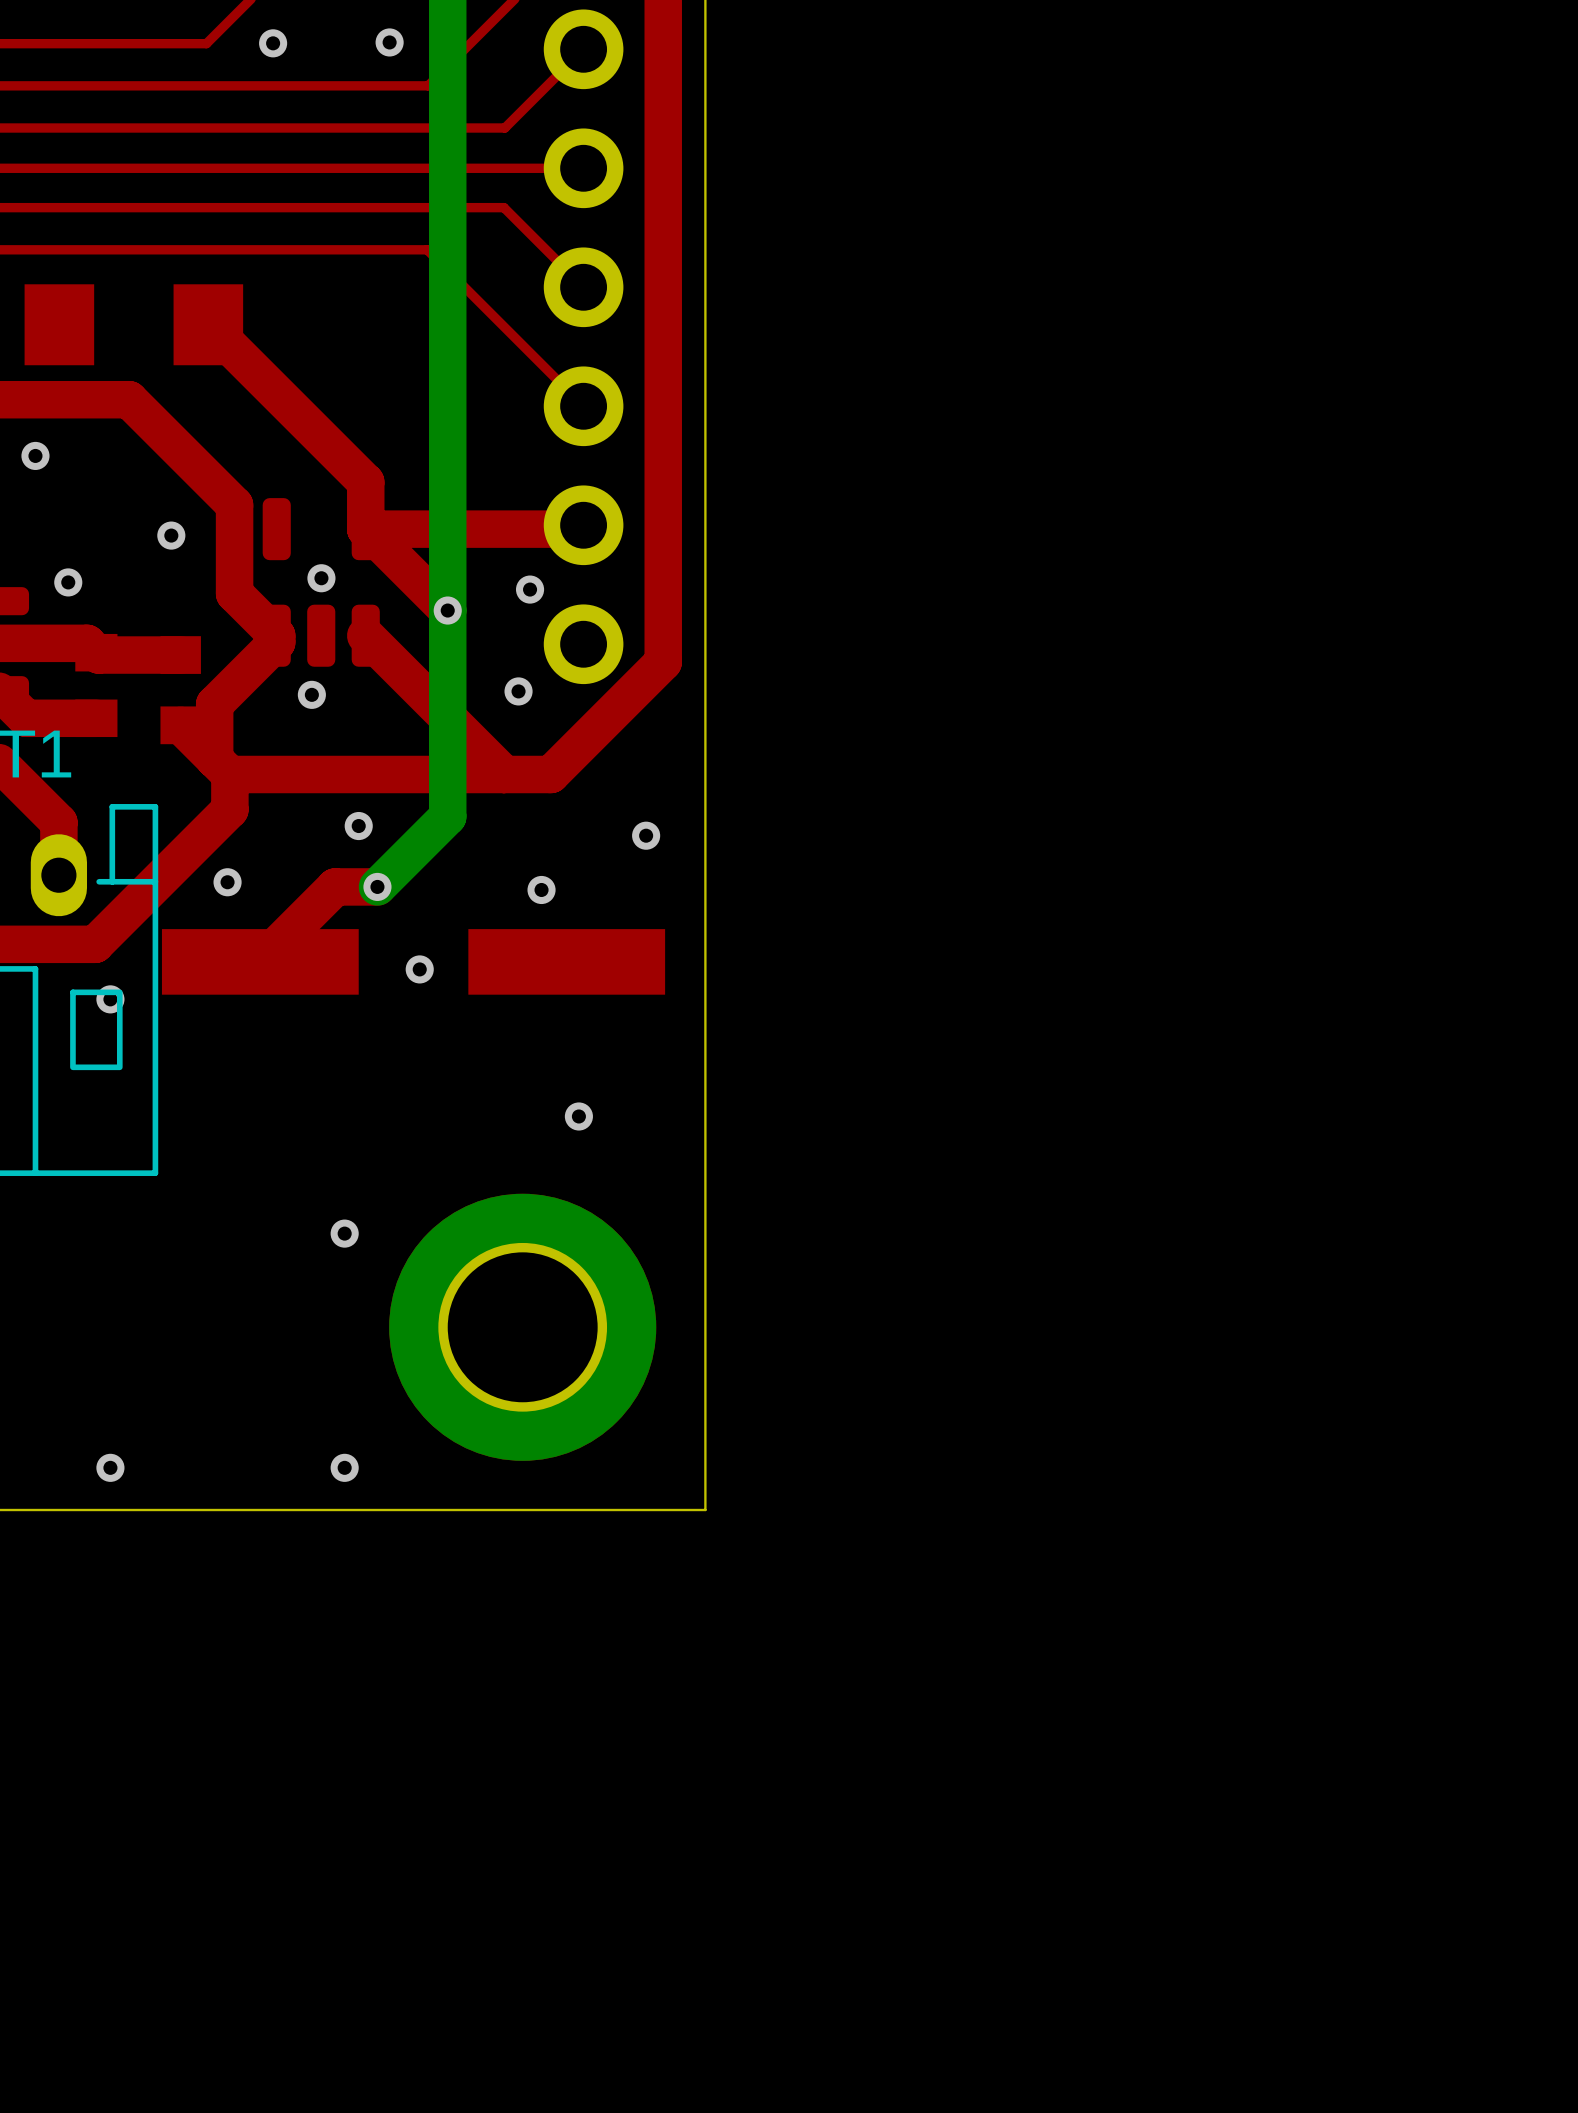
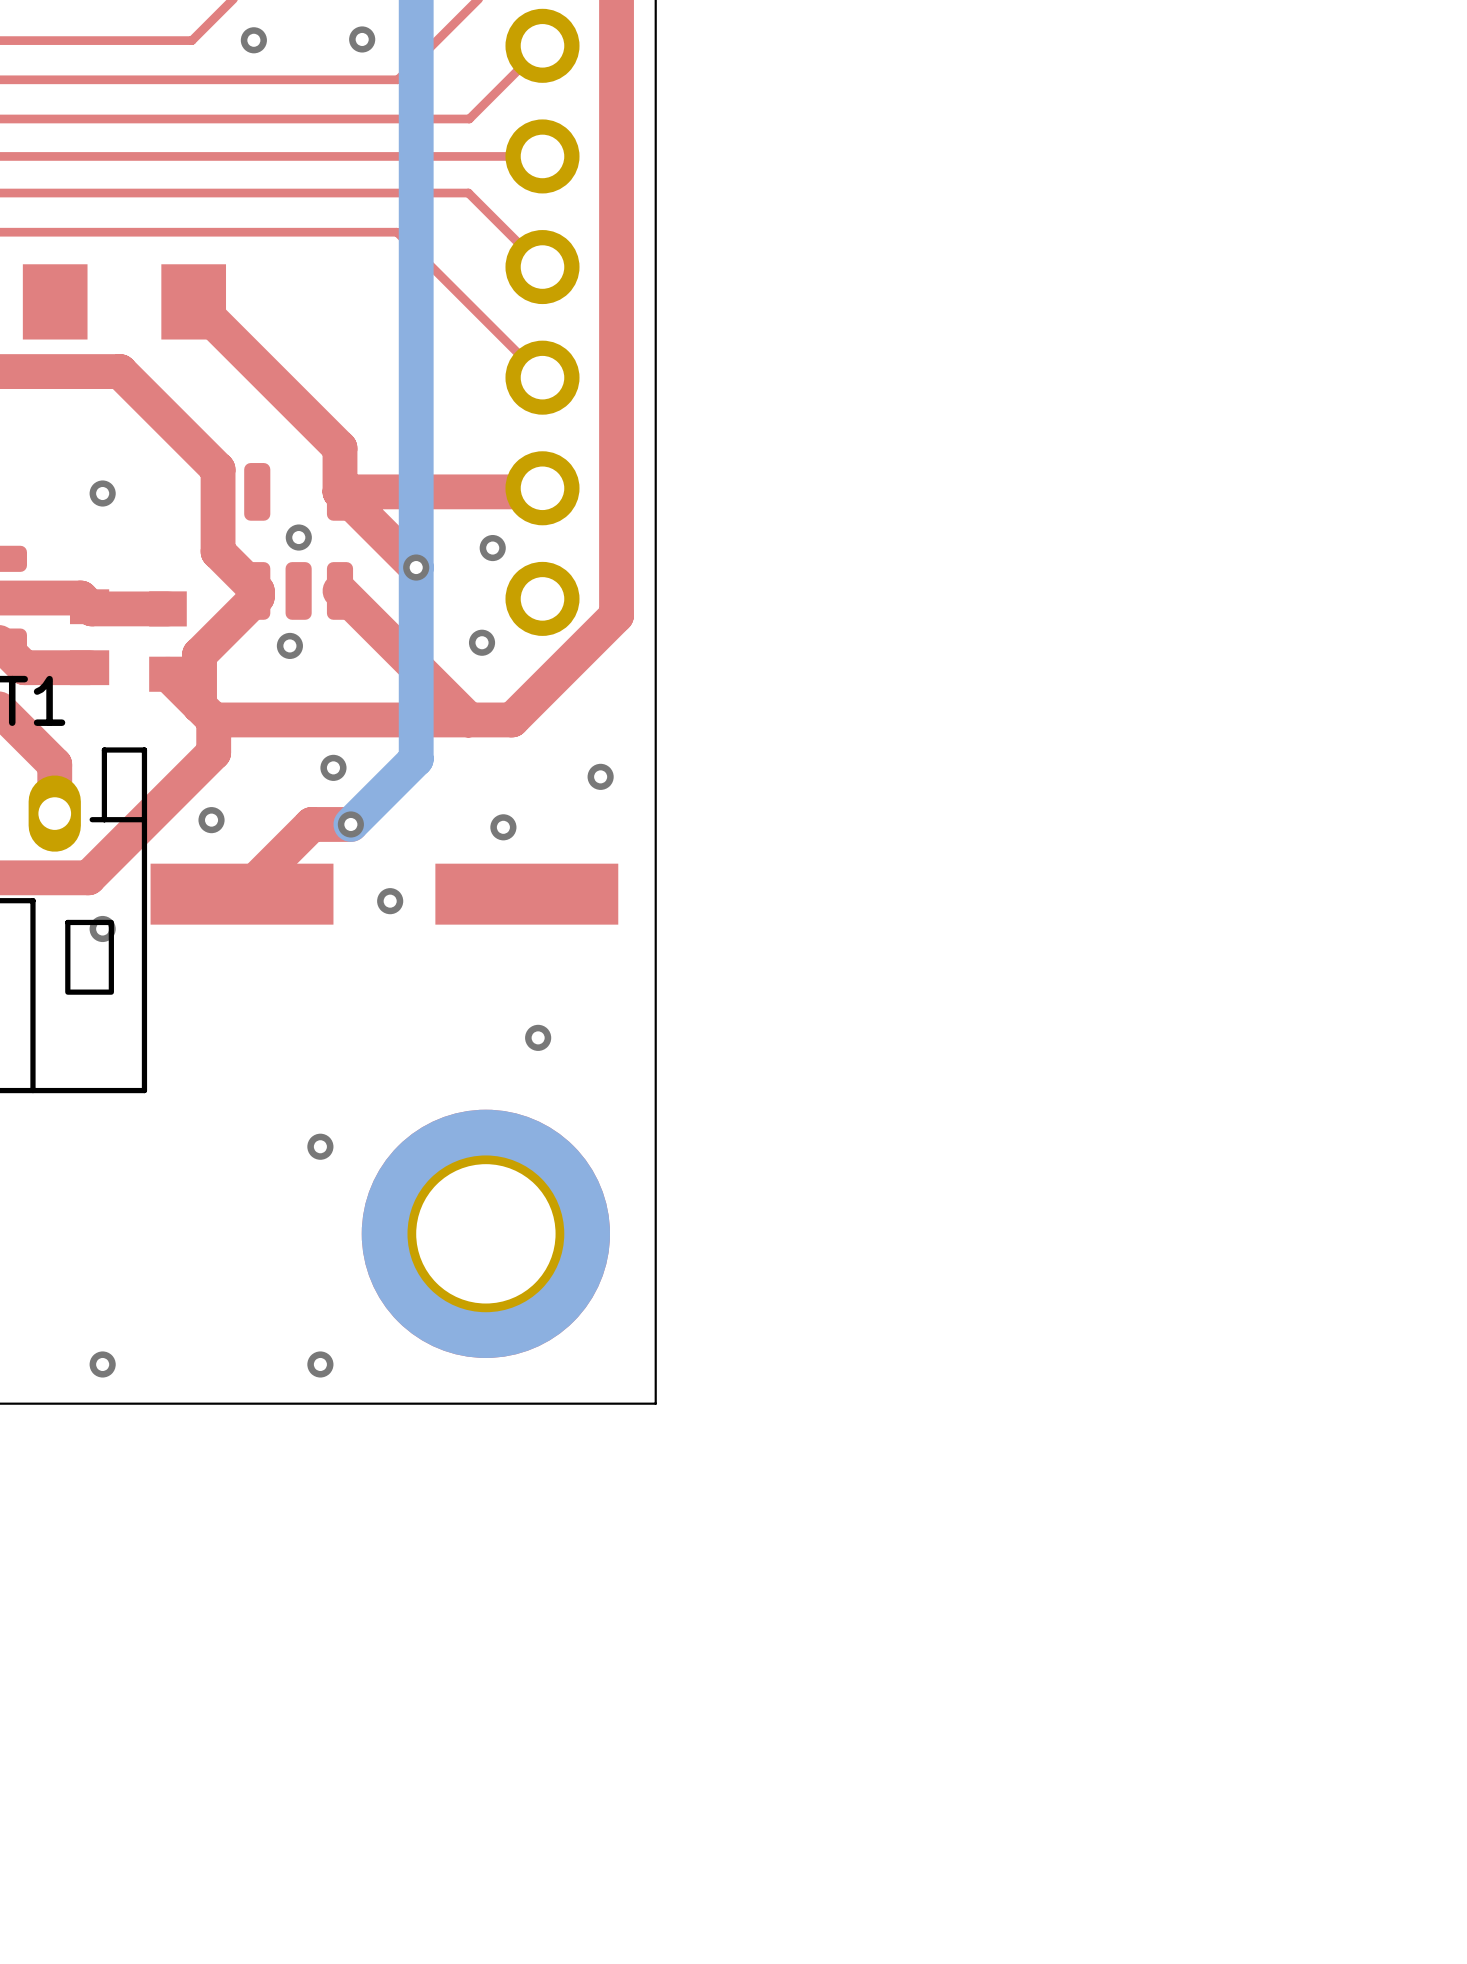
via: (35, 455) -> none
via: none -> (102, 493)
via: (171, 535) -> none
via: (68, 582) -> none

